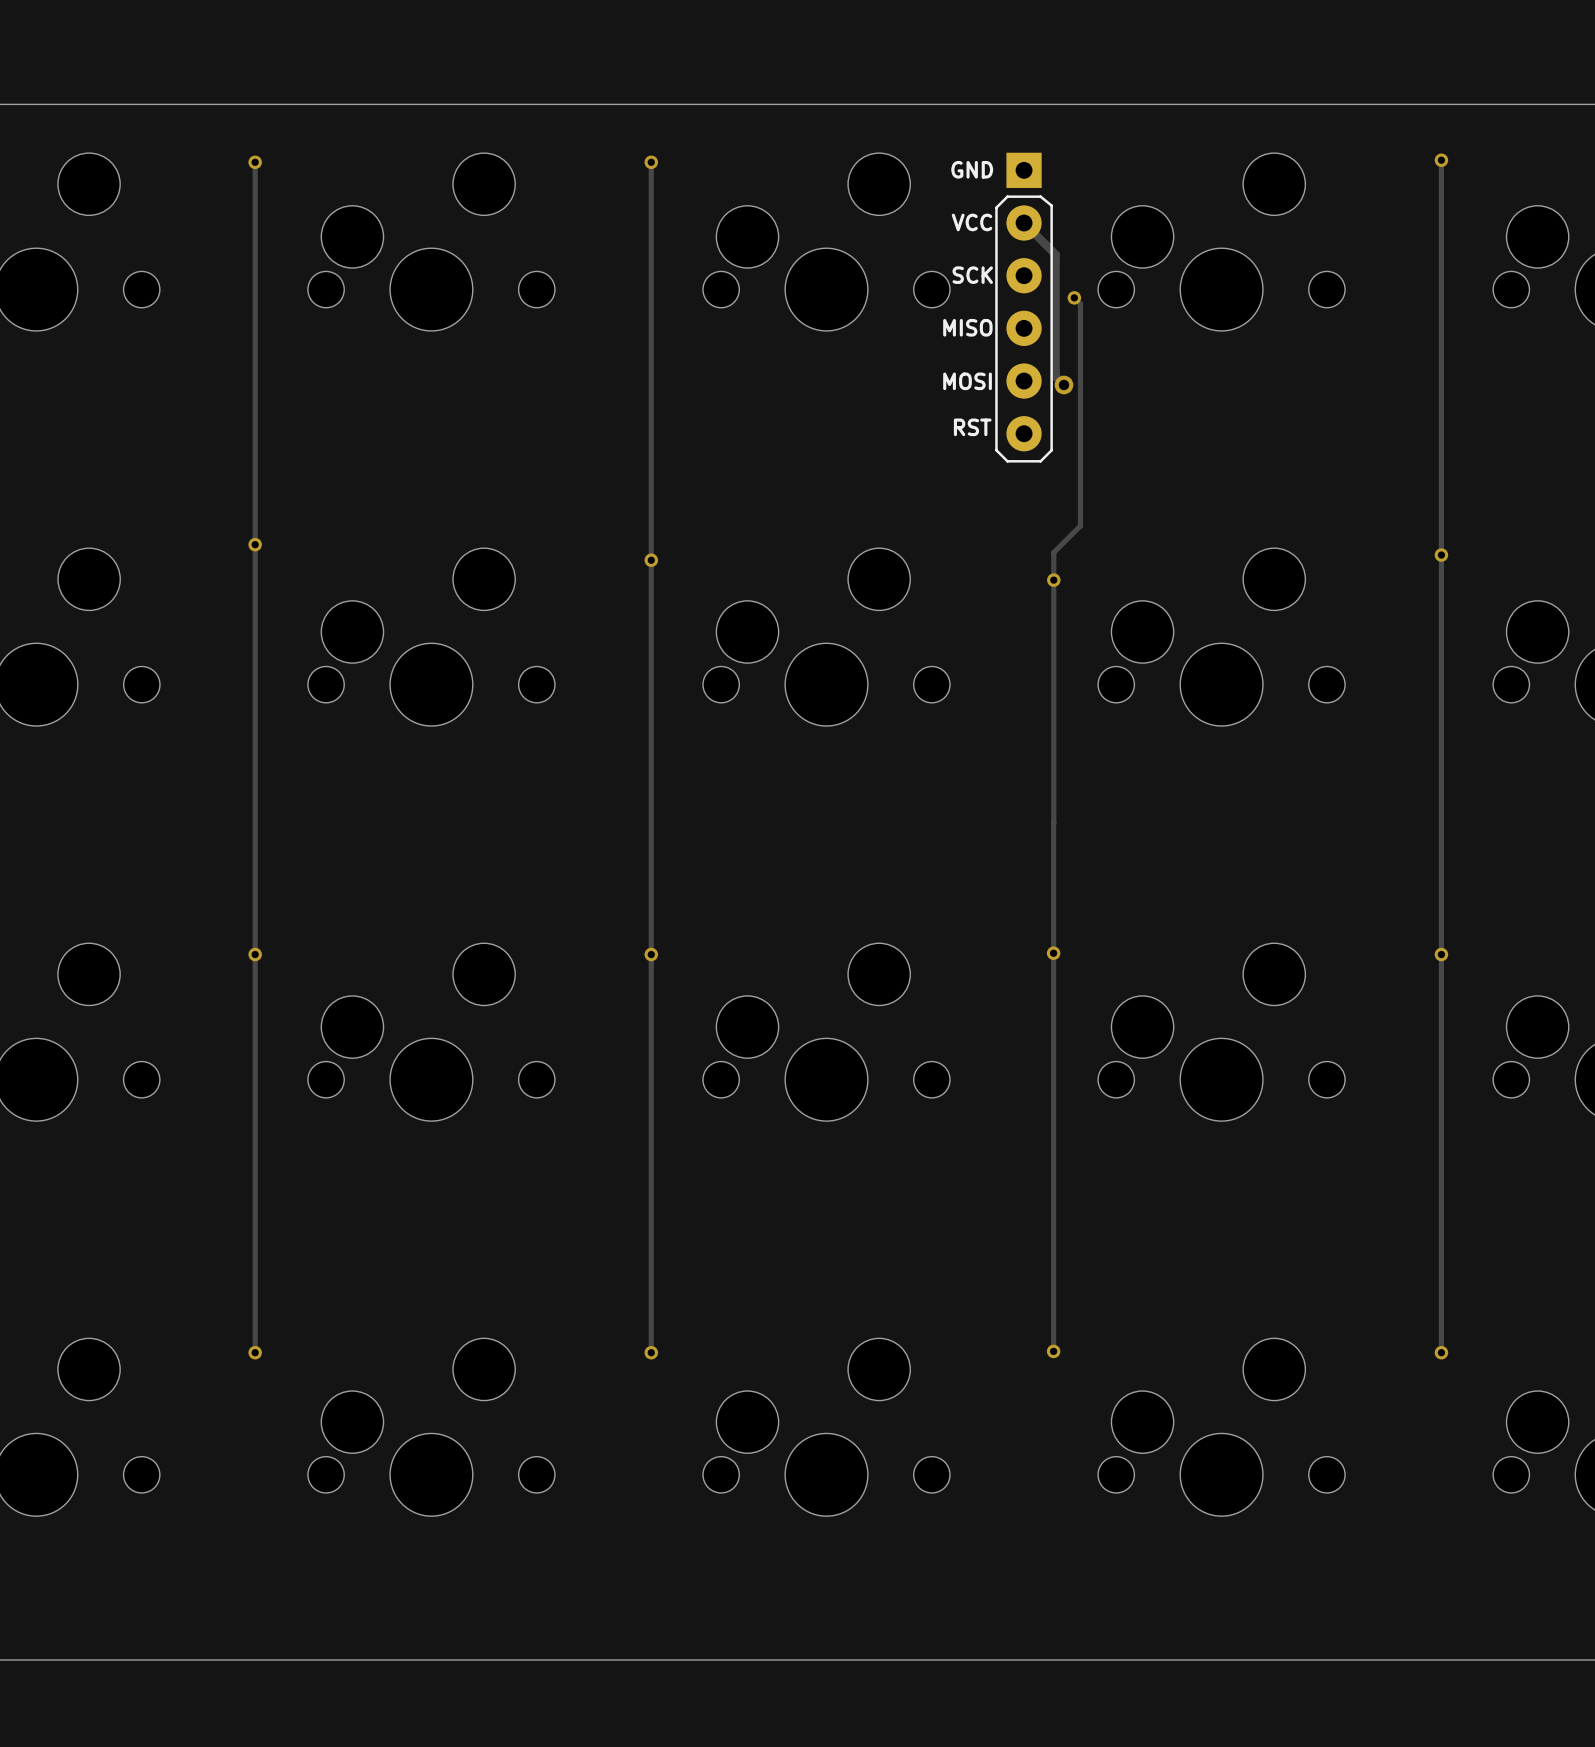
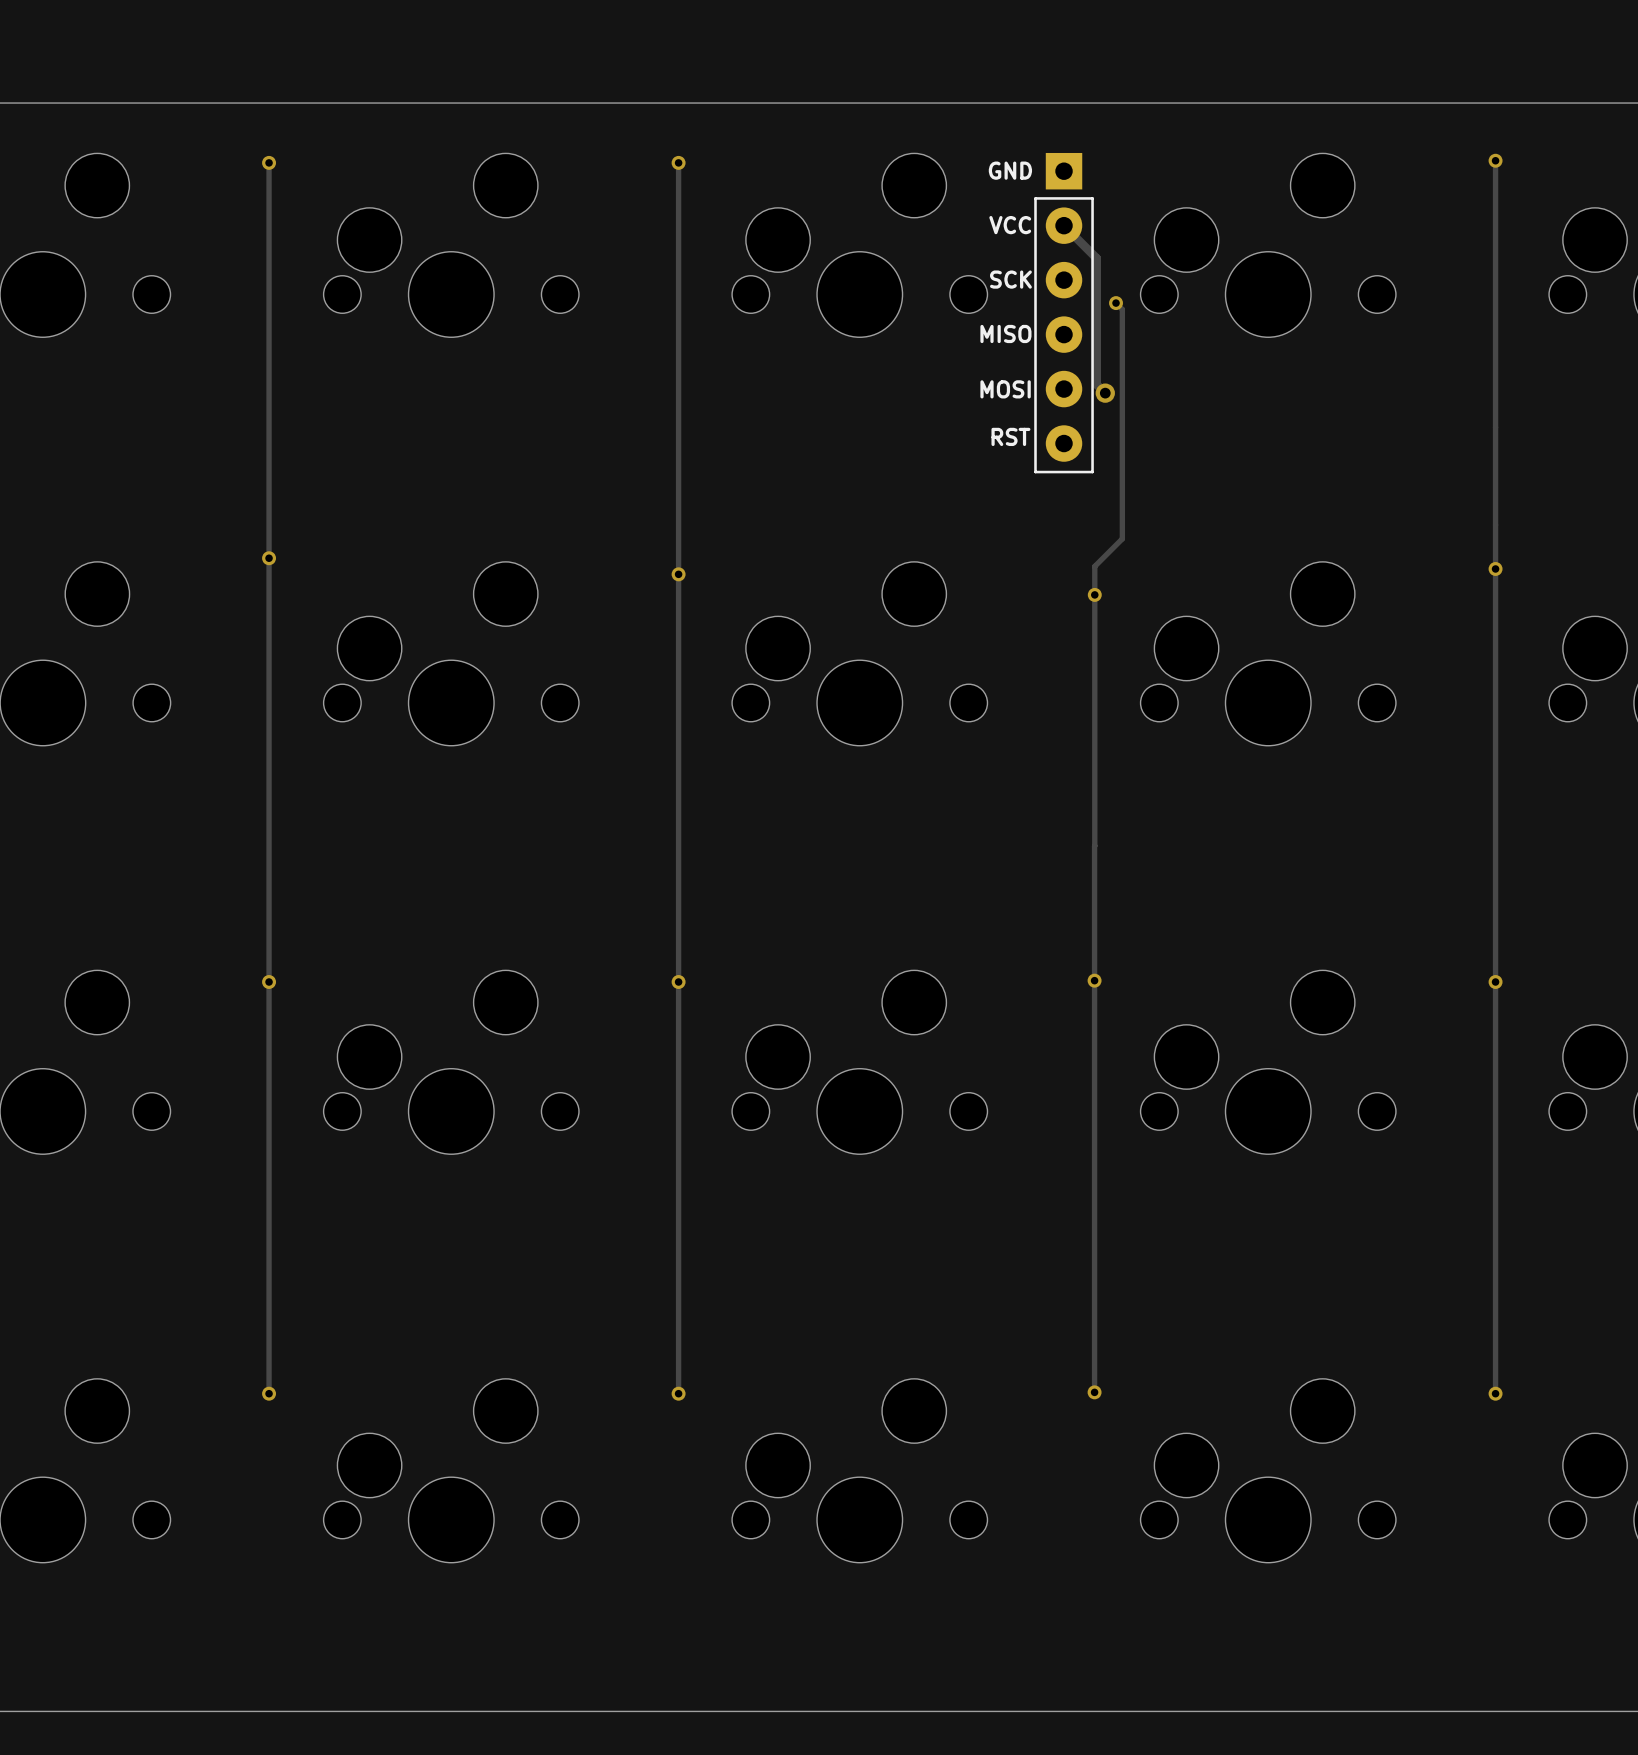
part footprint: [995, 152, 1053, 463] -> [1034, 152, 1094, 474]

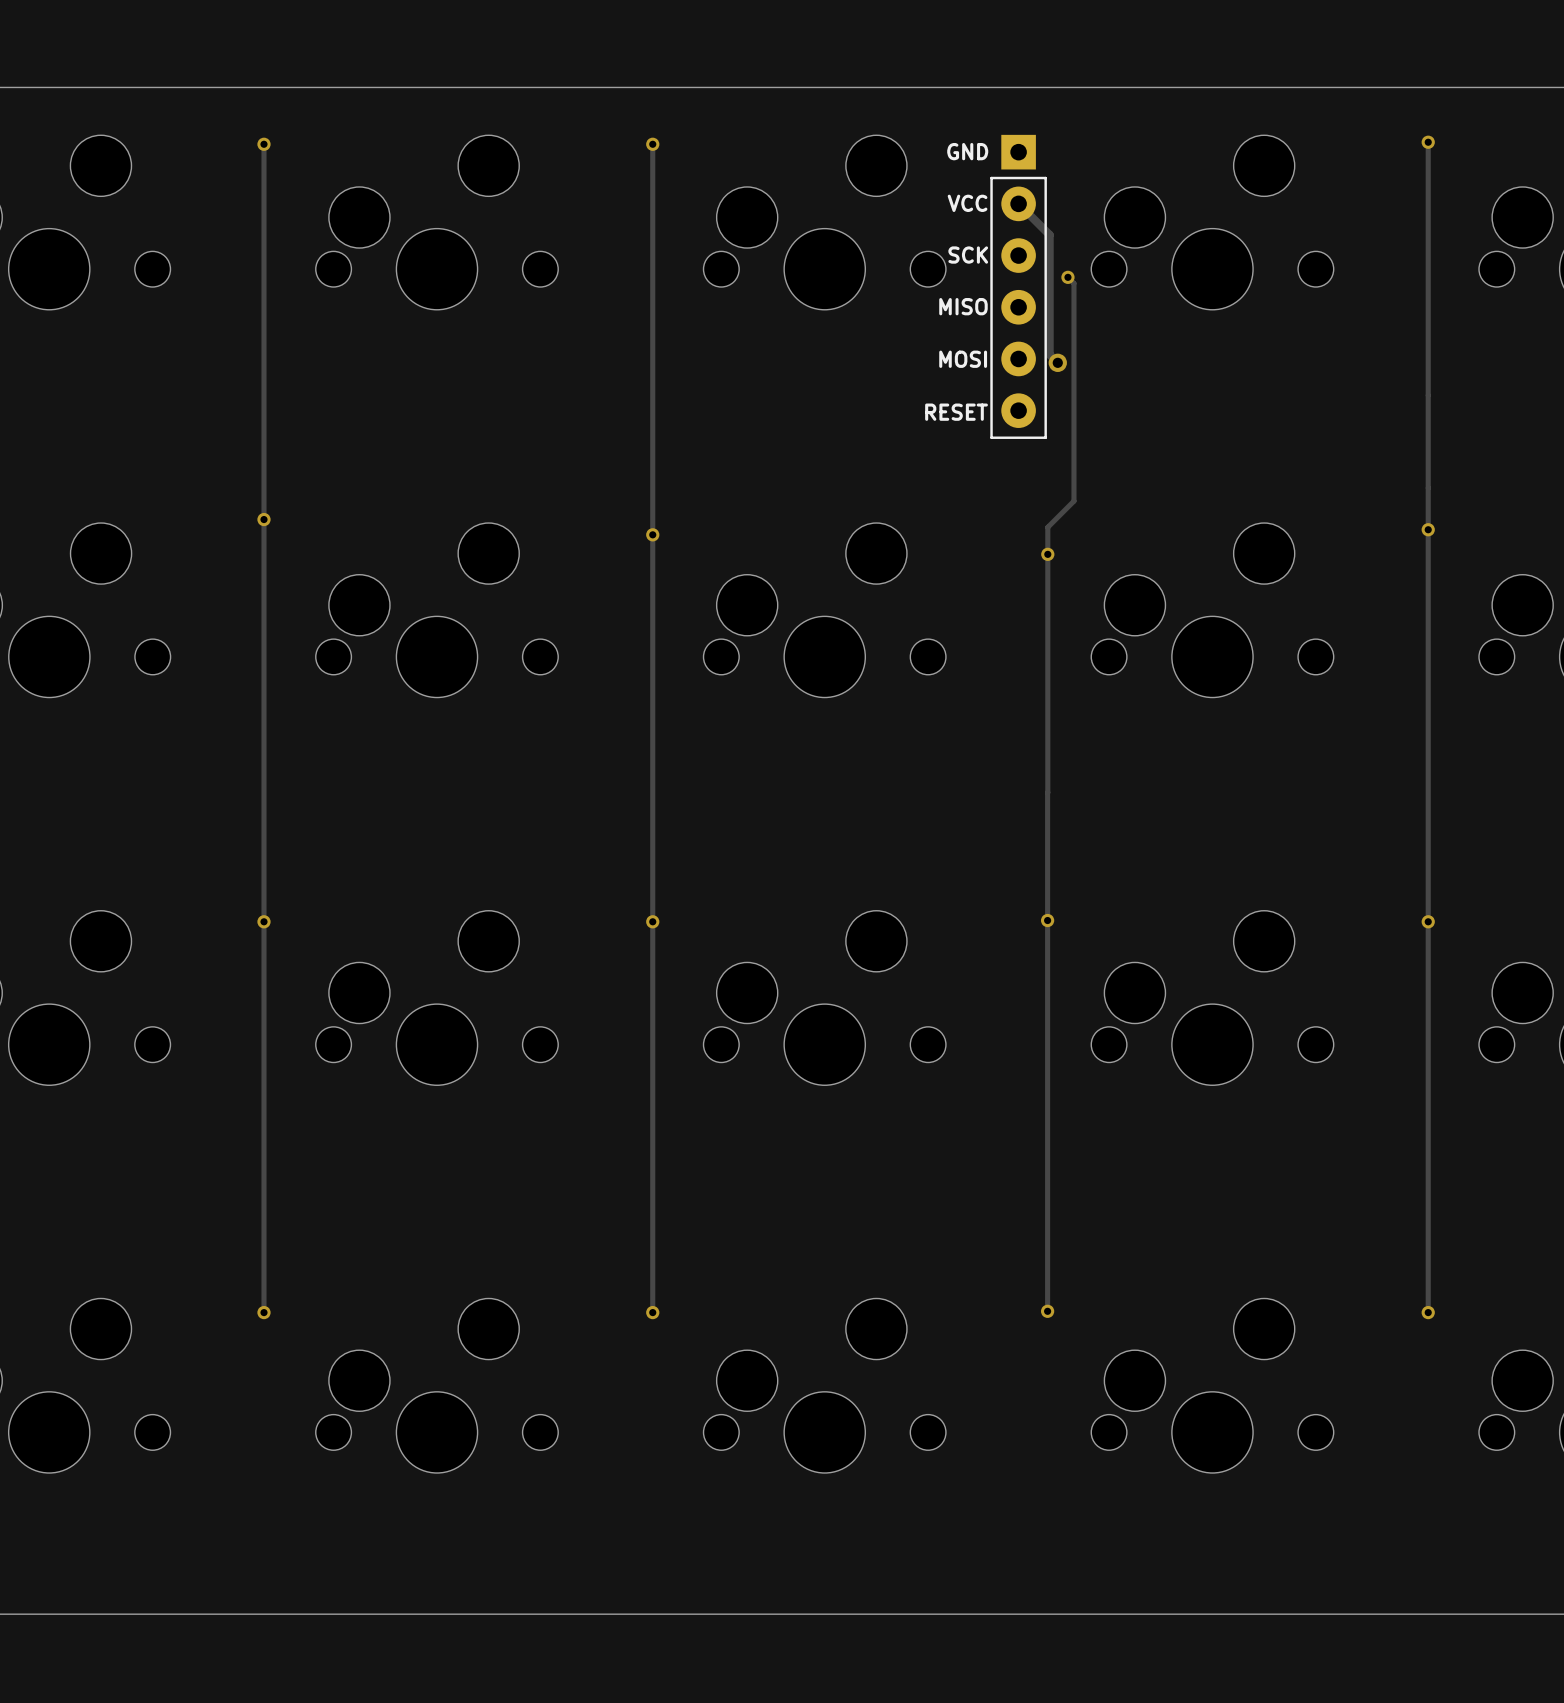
part text: RST (1010, 436) -> none
part text: none -> RESET (956, 412)

